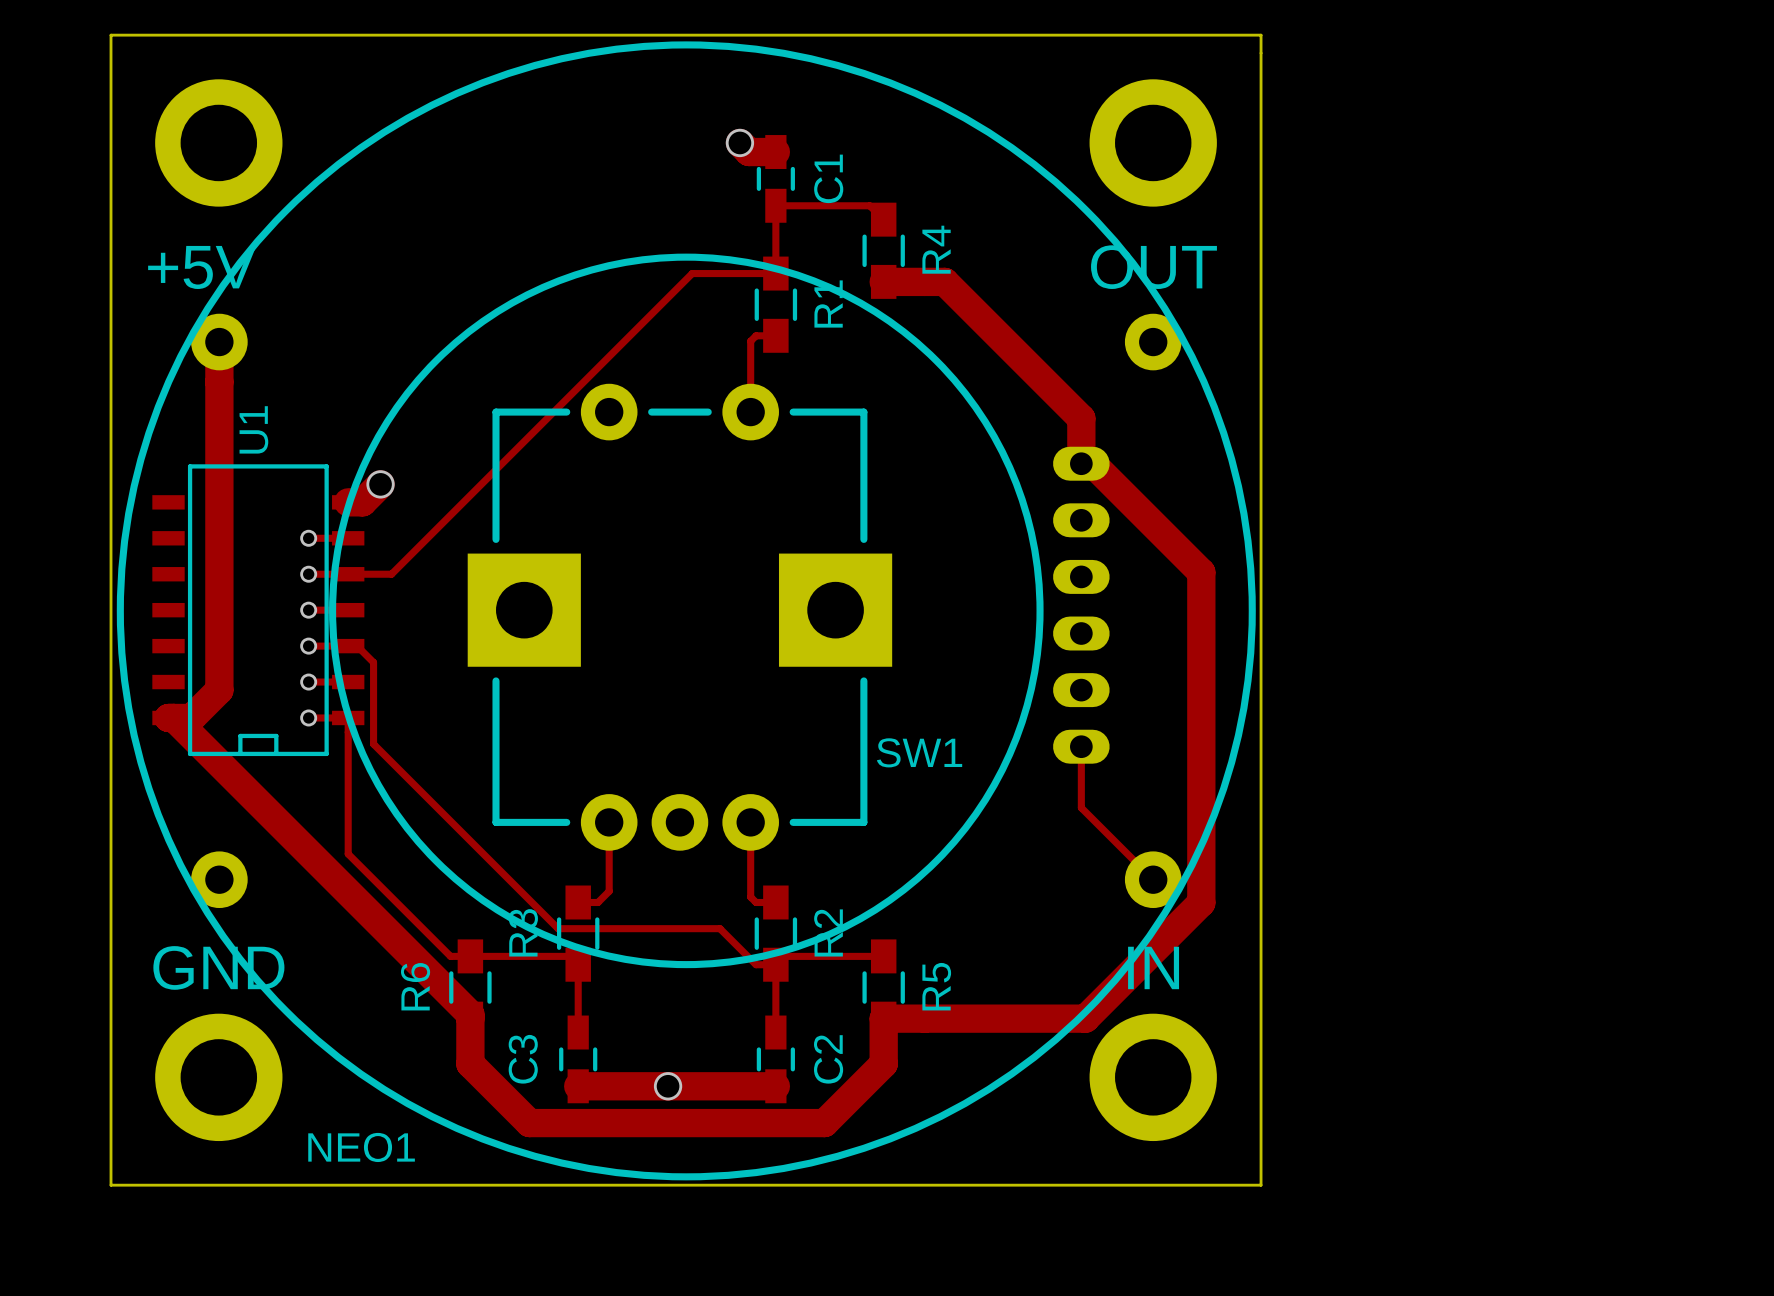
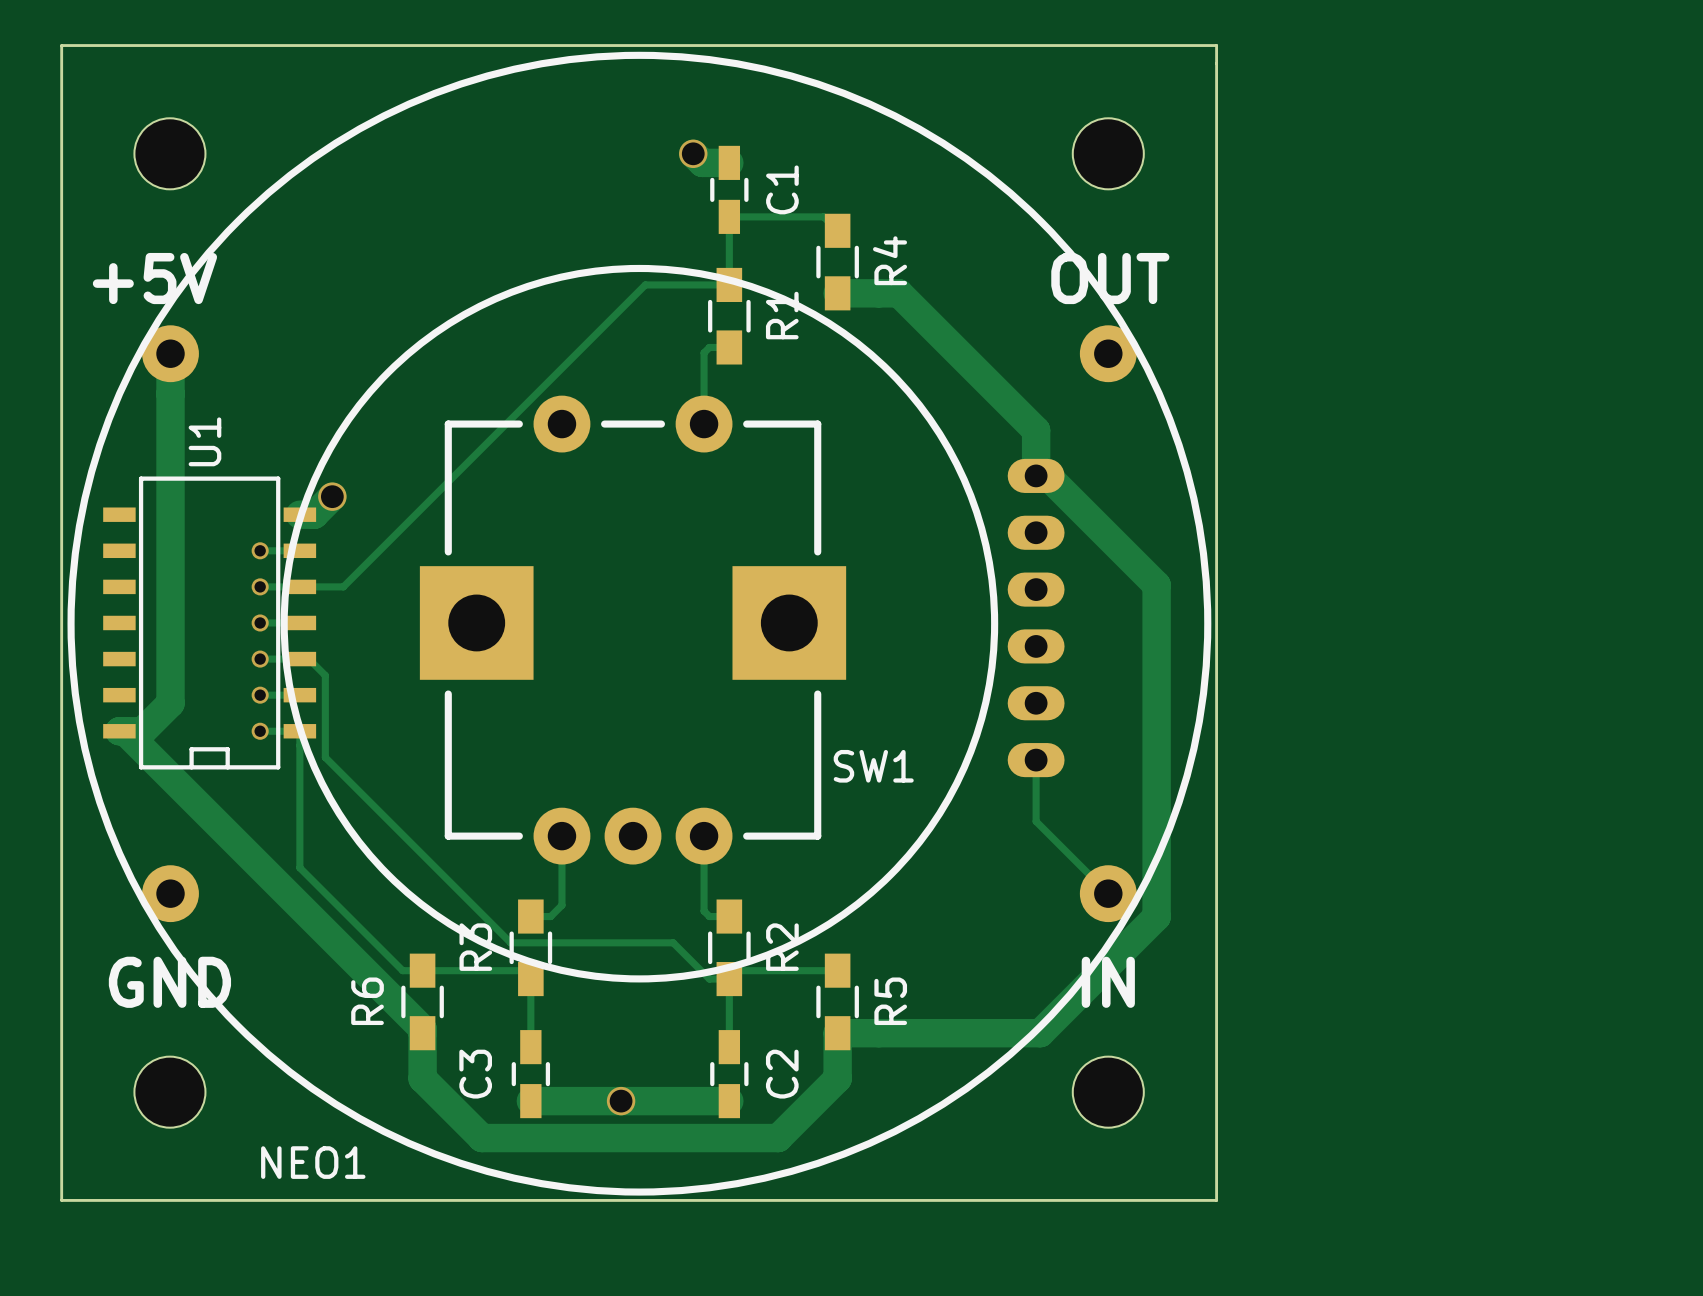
part footprint: [155, 79, 283, 207] -> [134, 118, 206, 190]
part footprint: [1089, 79, 1217, 207] -> [1072, 118, 1144, 190]
part footprint: [155, 1013, 283, 1142] -> [134, 1056, 206, 1128]
part footprint: [1089, 1013, 1217, 1142] -> [1072, 1056, 1144, 1128]

